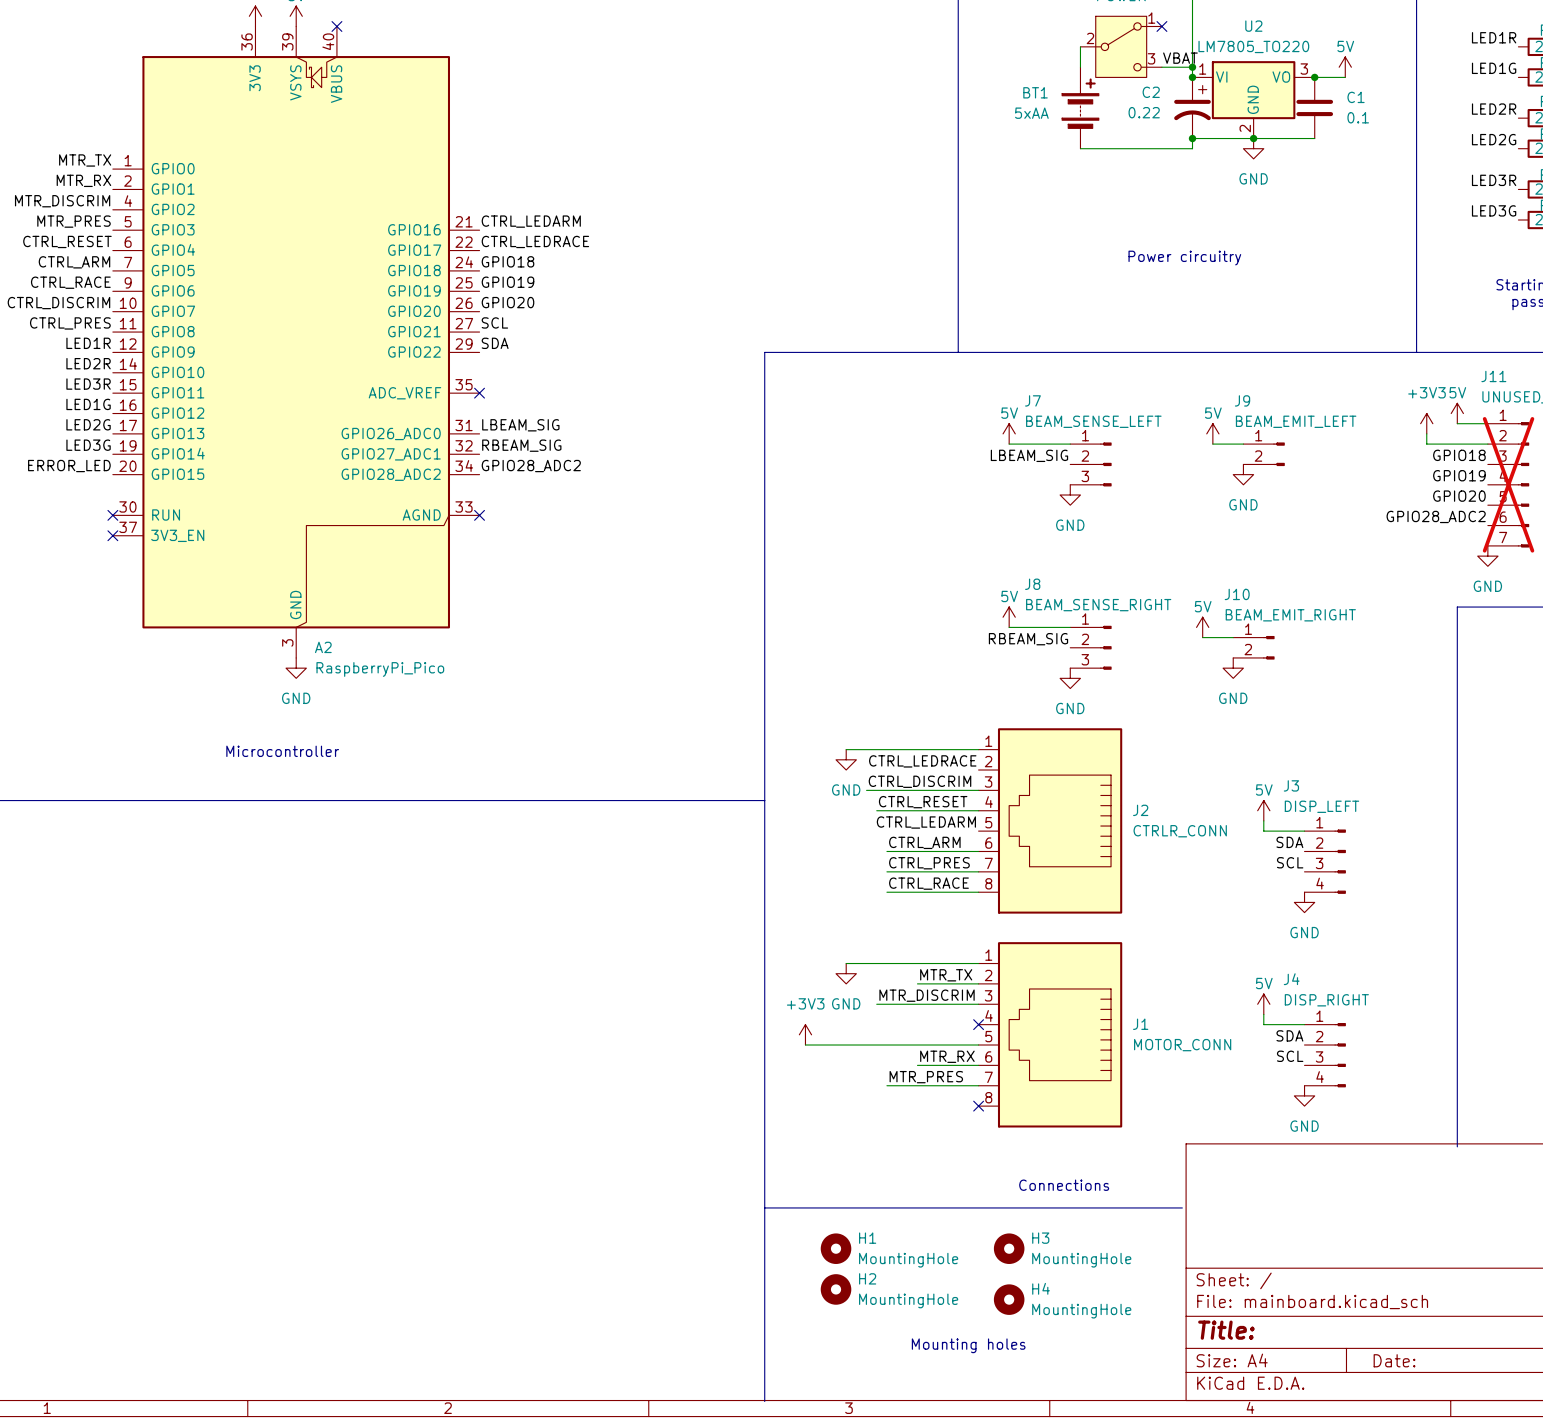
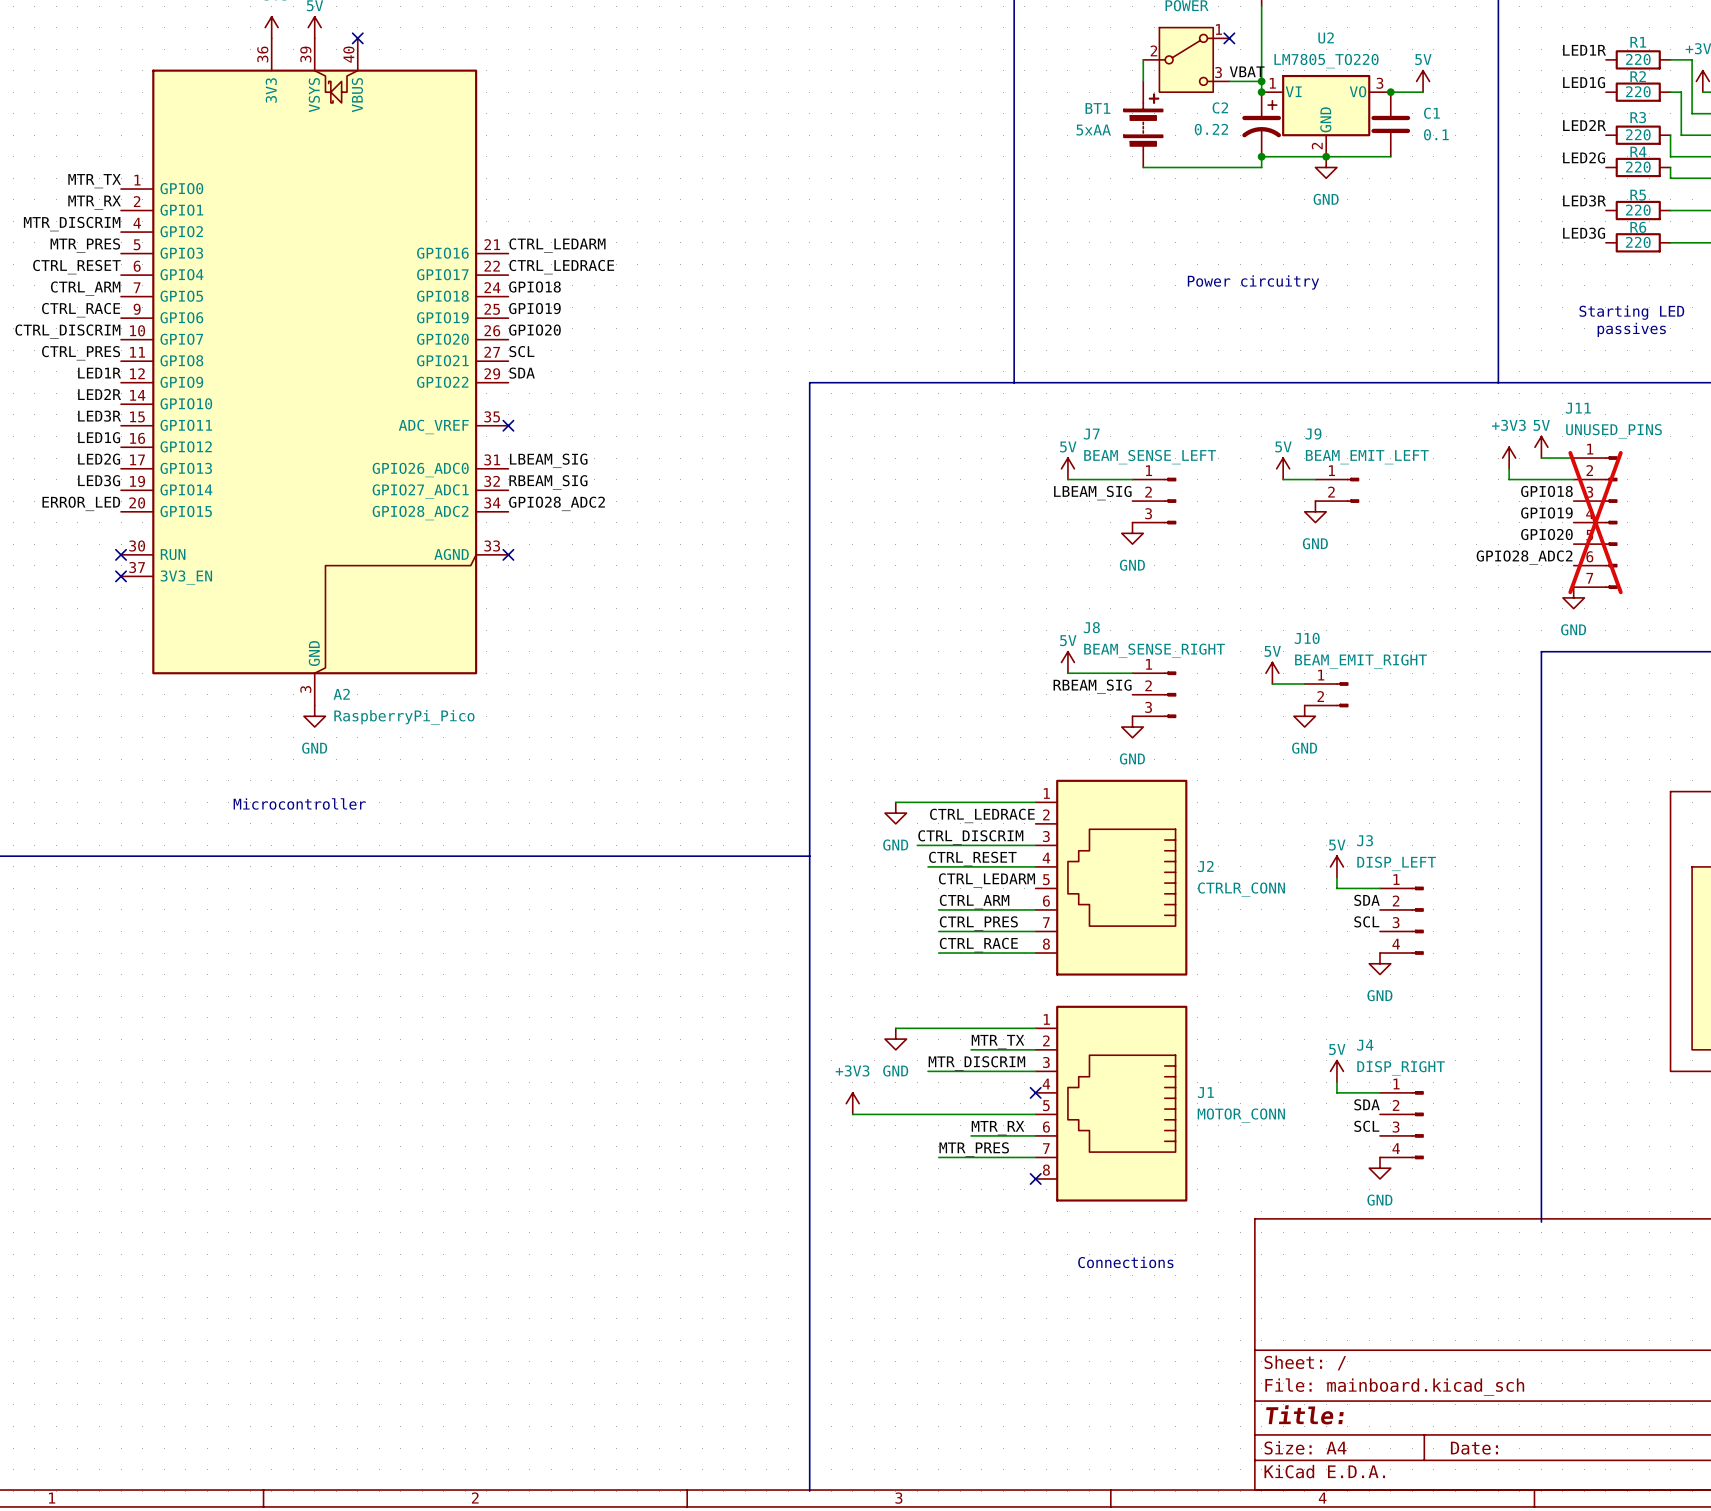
line: (764, 1207) (1182, 1207) -> none
H1: MountingHole (836, 1248) -> none
H3: MountingHole (1009, 1248) -> none
H2: MountingHole (836, 1289) -> none
H4: MountingHole (1009, 1299) -> none
text: Mounting holes (968, 1345) -> none

